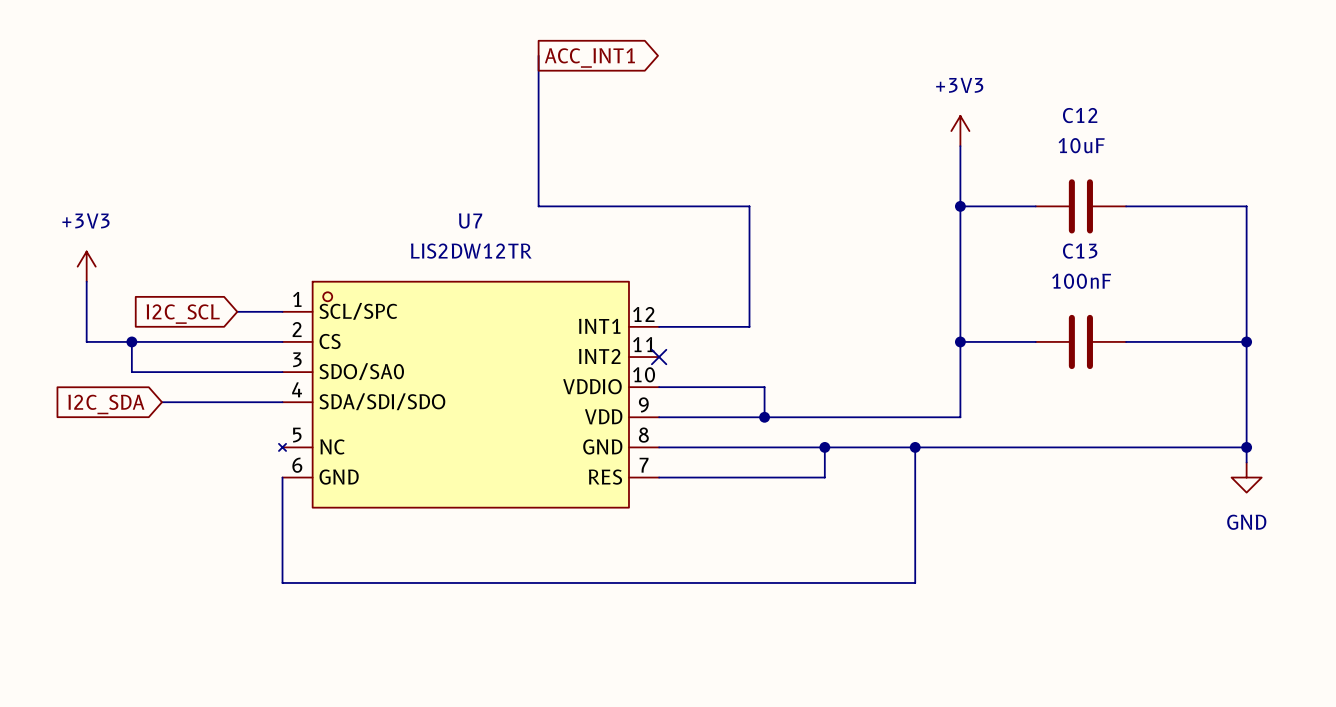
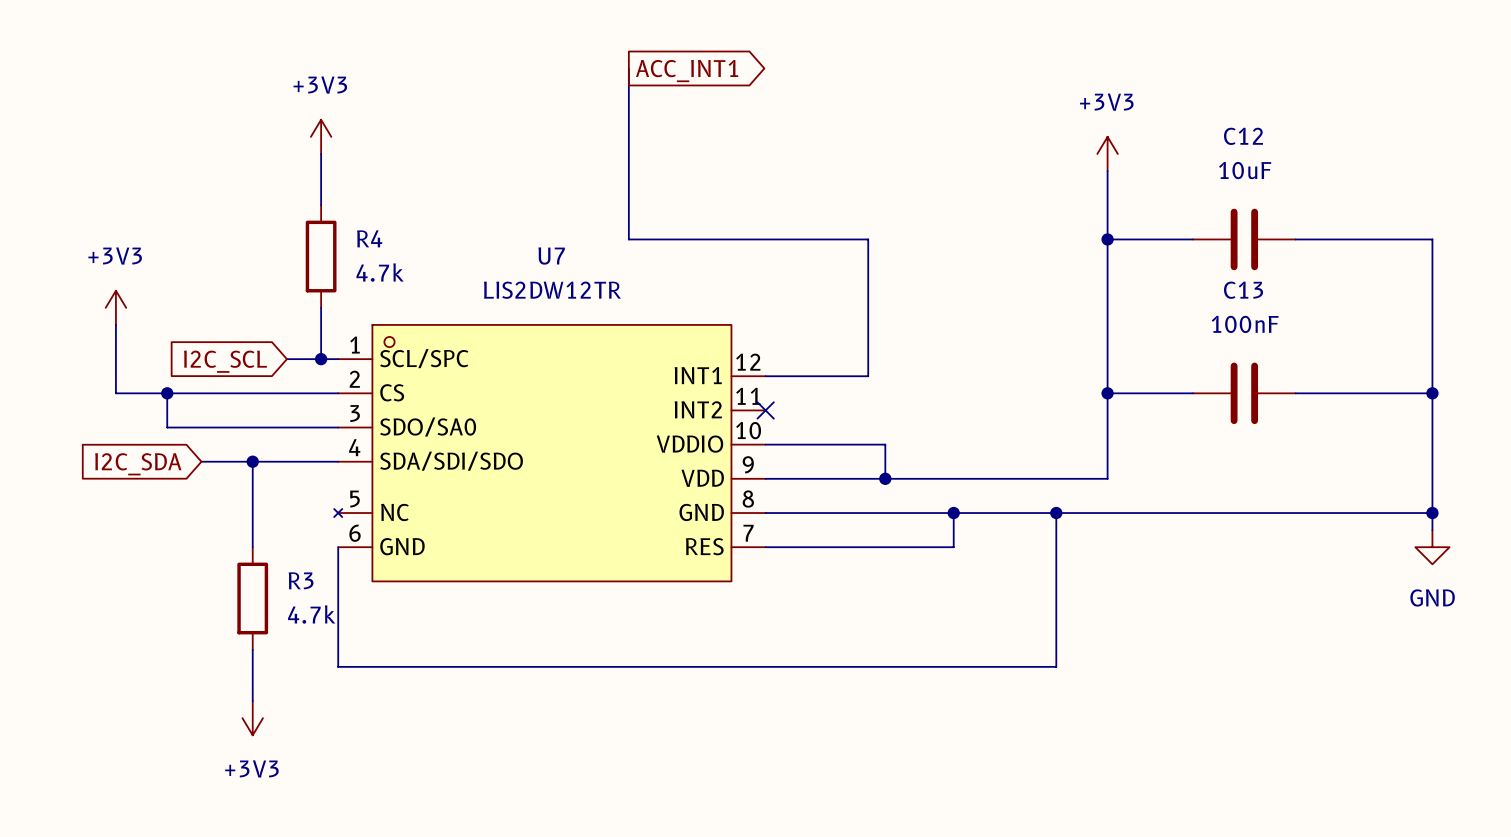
power symbol: none -> +3V3 (321, 136)
wire: none -> (321, 153) (321, 205)
R4: none -> 4.7k (321, 256)
wire: none -> (321, 307) (321, 359)
junction: none -> (321, 359)
wire: none -> (252, 461) (252, 547)
junction: none -> (252, 461)
R3: none -> 4.7k (252, 598)
wire: none -> (252, 649) (252, 701)
power symbol: none -> +3V3 (252, 718)

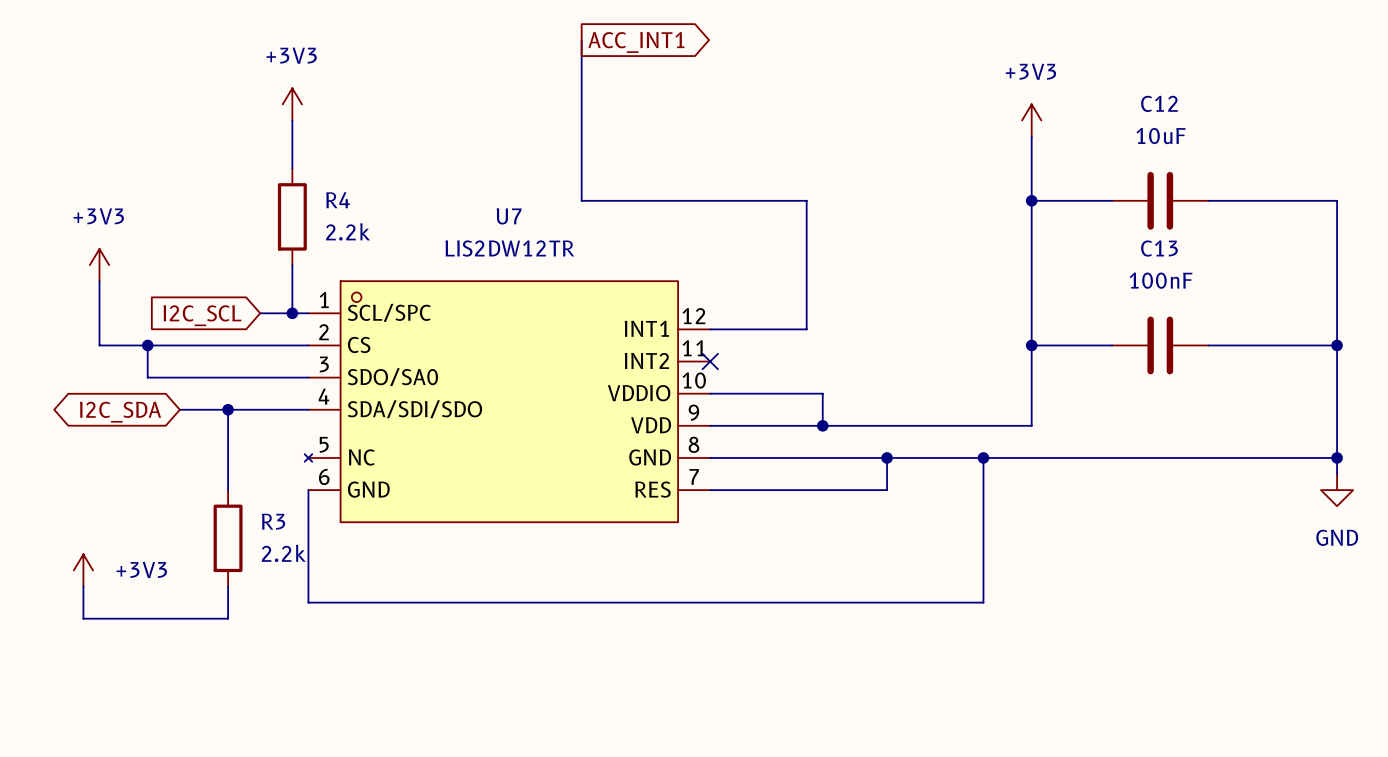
R4 value: 4.7k (380, 272) -> 2.2k (348, 231)
global label shape: input (138, 464) -> bidirectional (120, 412)
R3 value: 4.7k (311, 614) -> 2.2k (283, 553)
wire: (252, 683) (252, 701) -> (228, 618) (83, 618) (83, 586)
power symbol rotation: 0° (252, 718) -> 180° (83, 570)
power symbol position: +3V3 (252, 718) -> +3V3 (83, 570)
power symbol text position: +3V3 (251, 768) -> +3V3 (141, 569)

